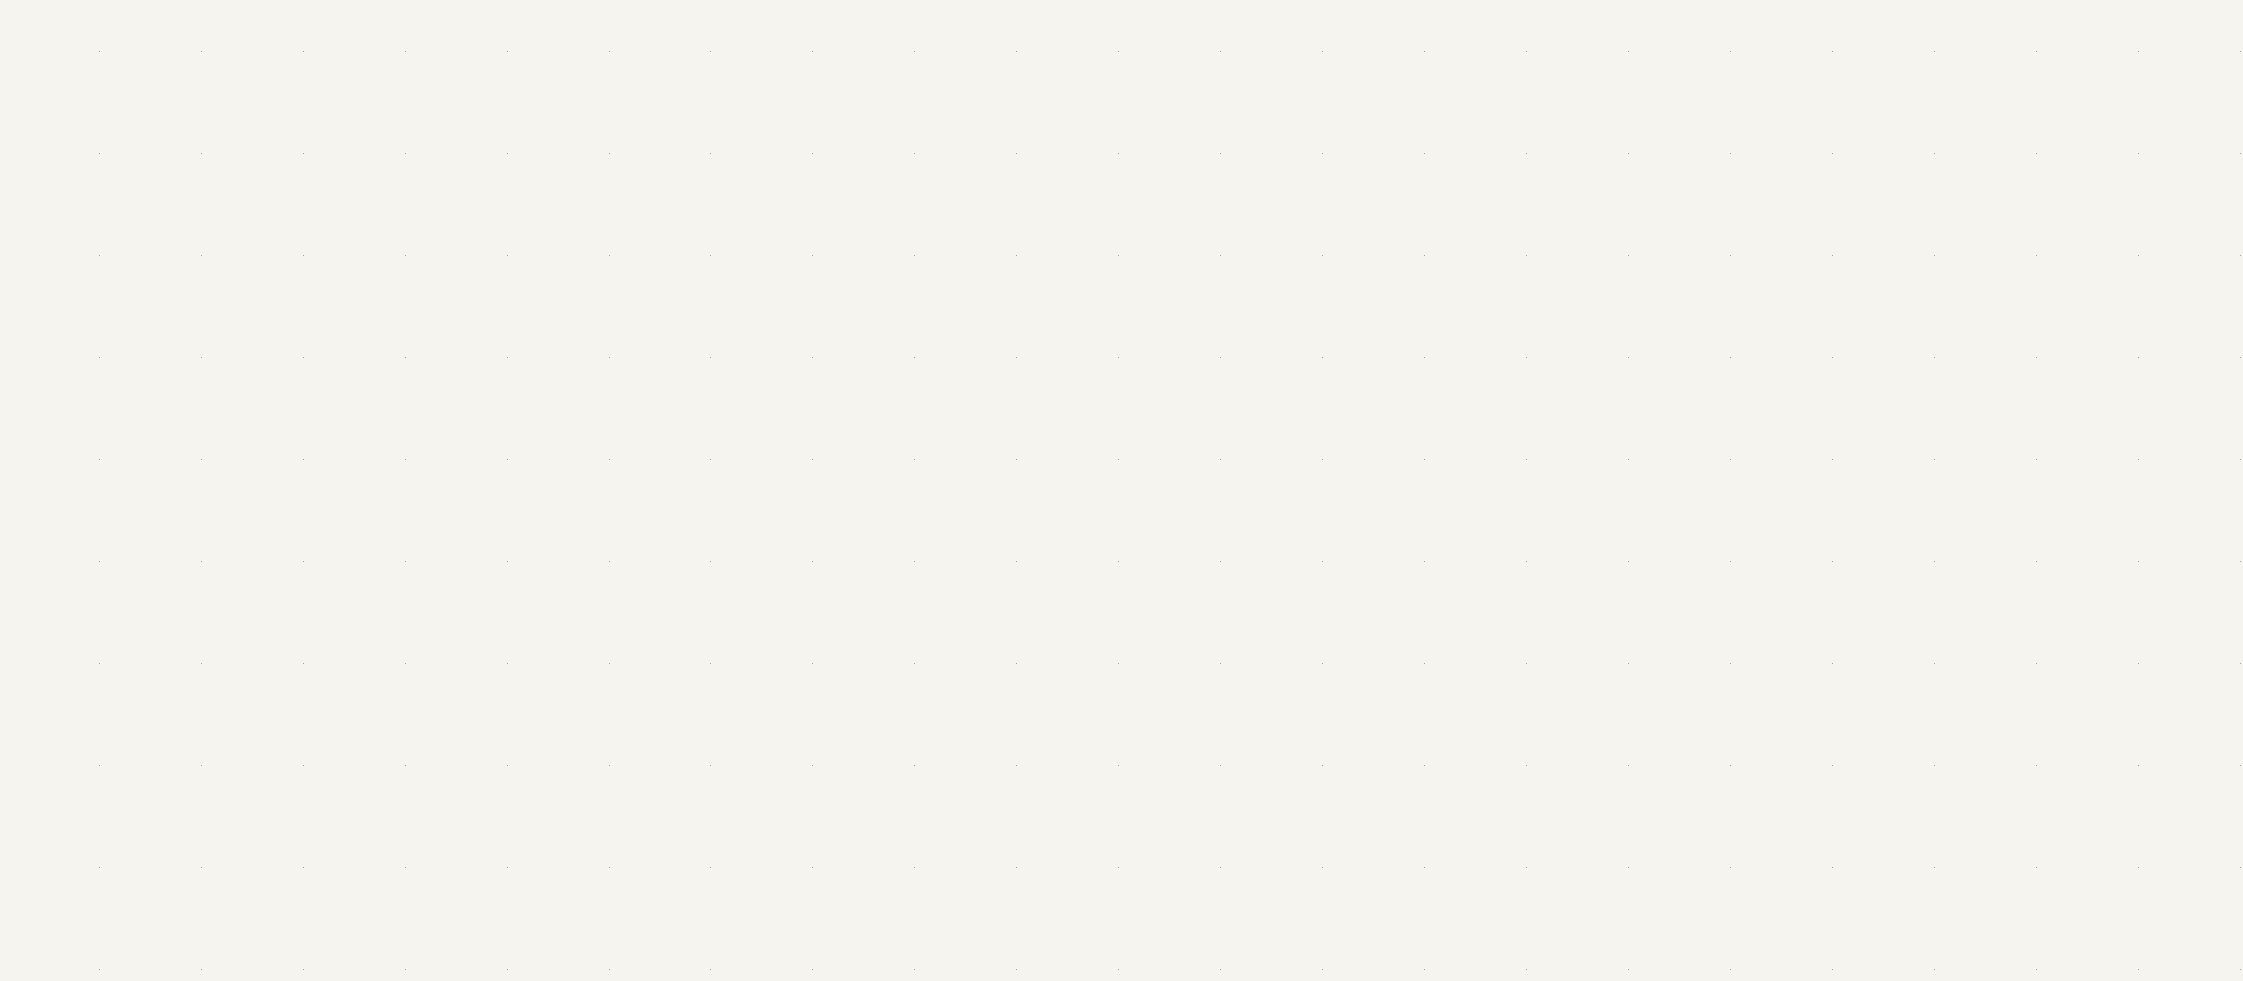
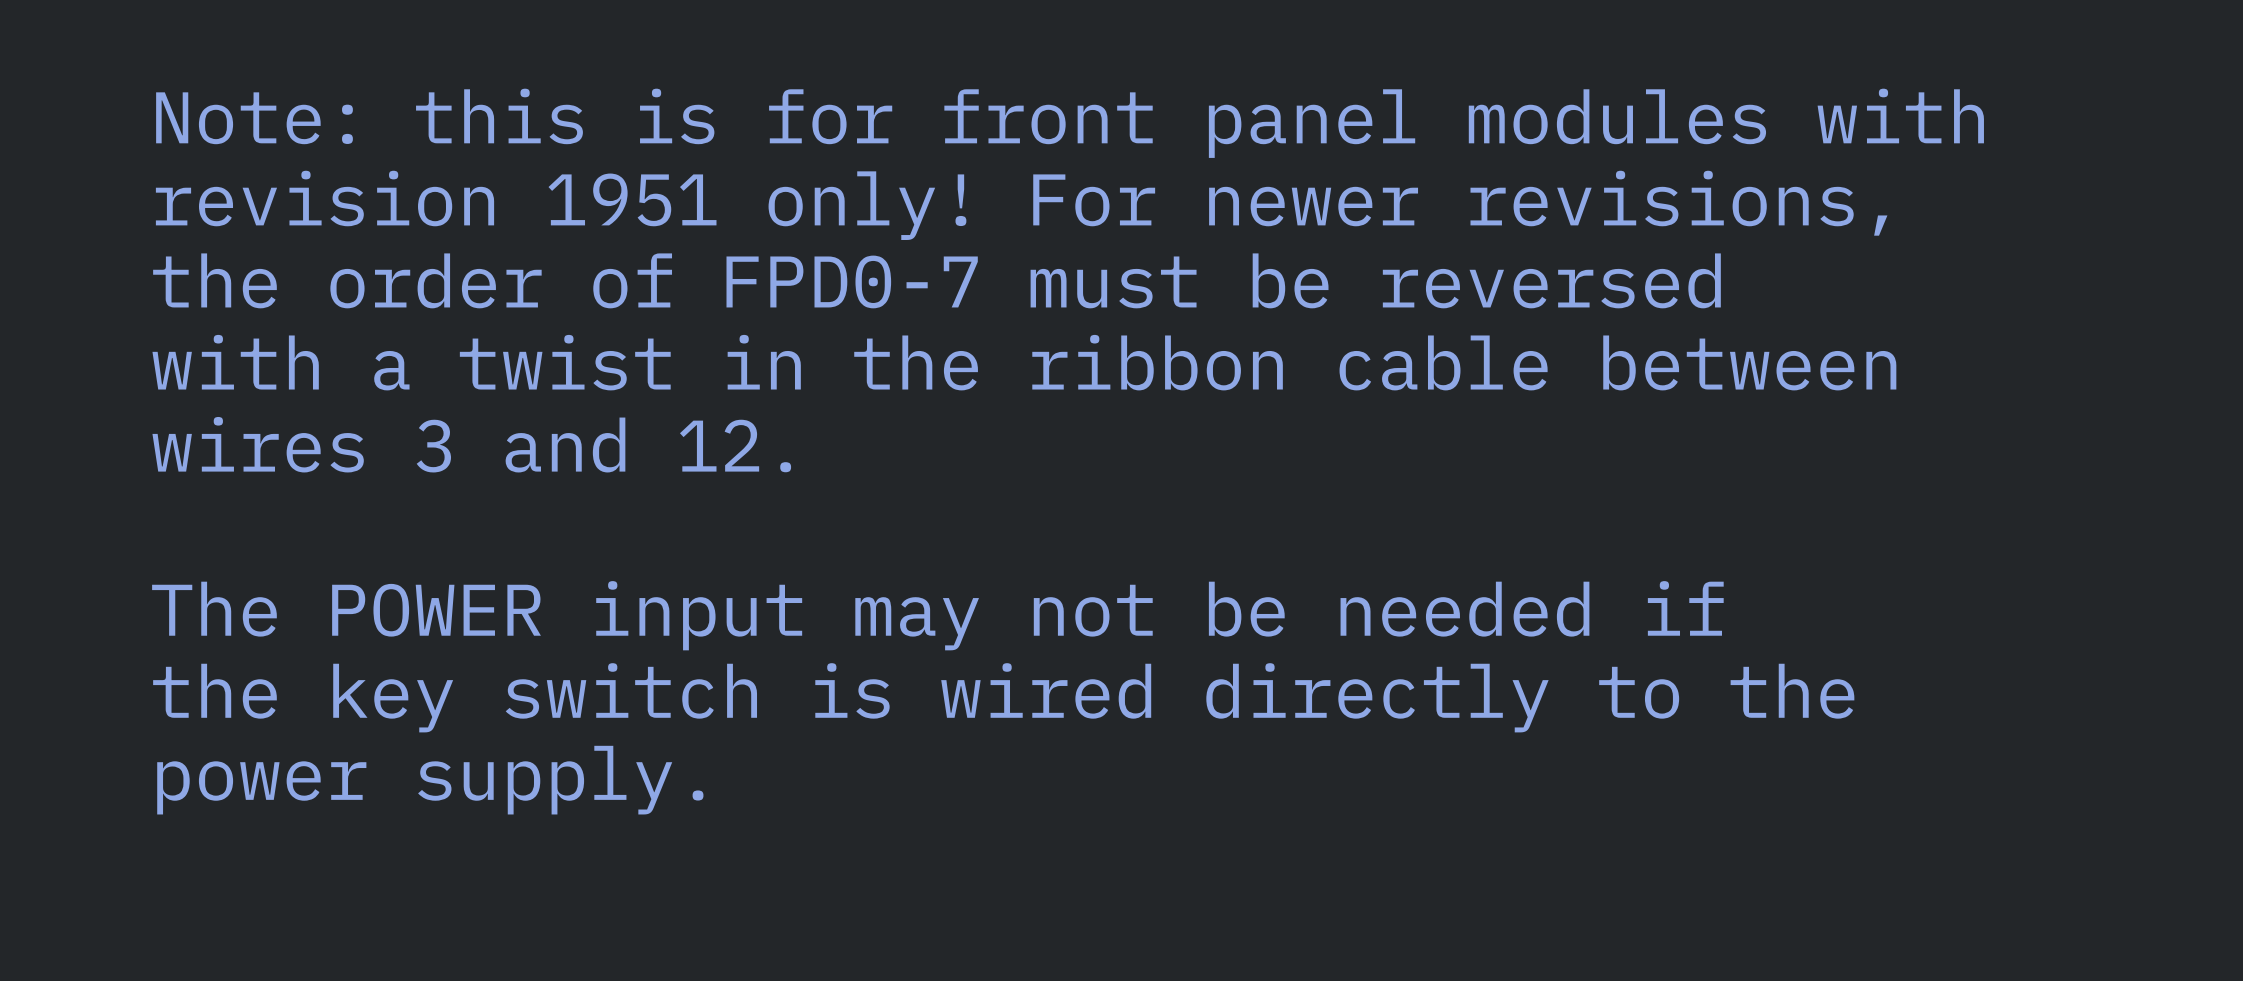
text: none -> Note: this is for front panel modules with (1070, 123)
text: none -> revision 1951 only! For newer revisions, (1021, 205)
text: none -> the order of FPD0-7 must be reversed (936, 280)
text: none -> with a twist in the ribbon cable between (1024, 362)
text: none -> wires 3 and 12. (471, 444)
text: none -> The POWER input may not be needed if (937, 615)
text: none -> the key switch is wired directly to the (1003, 697)
text: none -> power supply. (430, 780)

